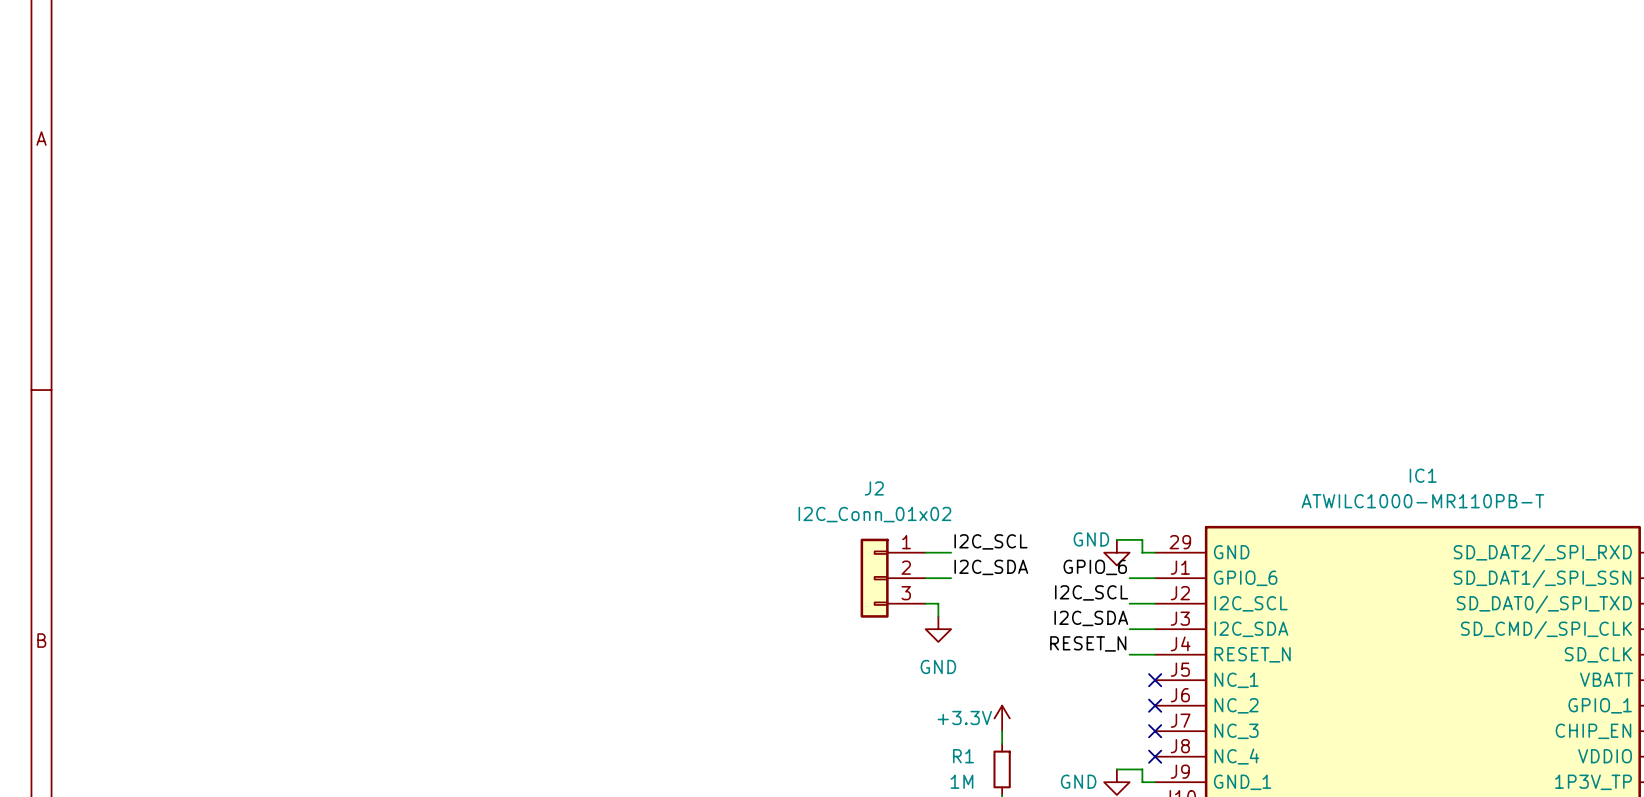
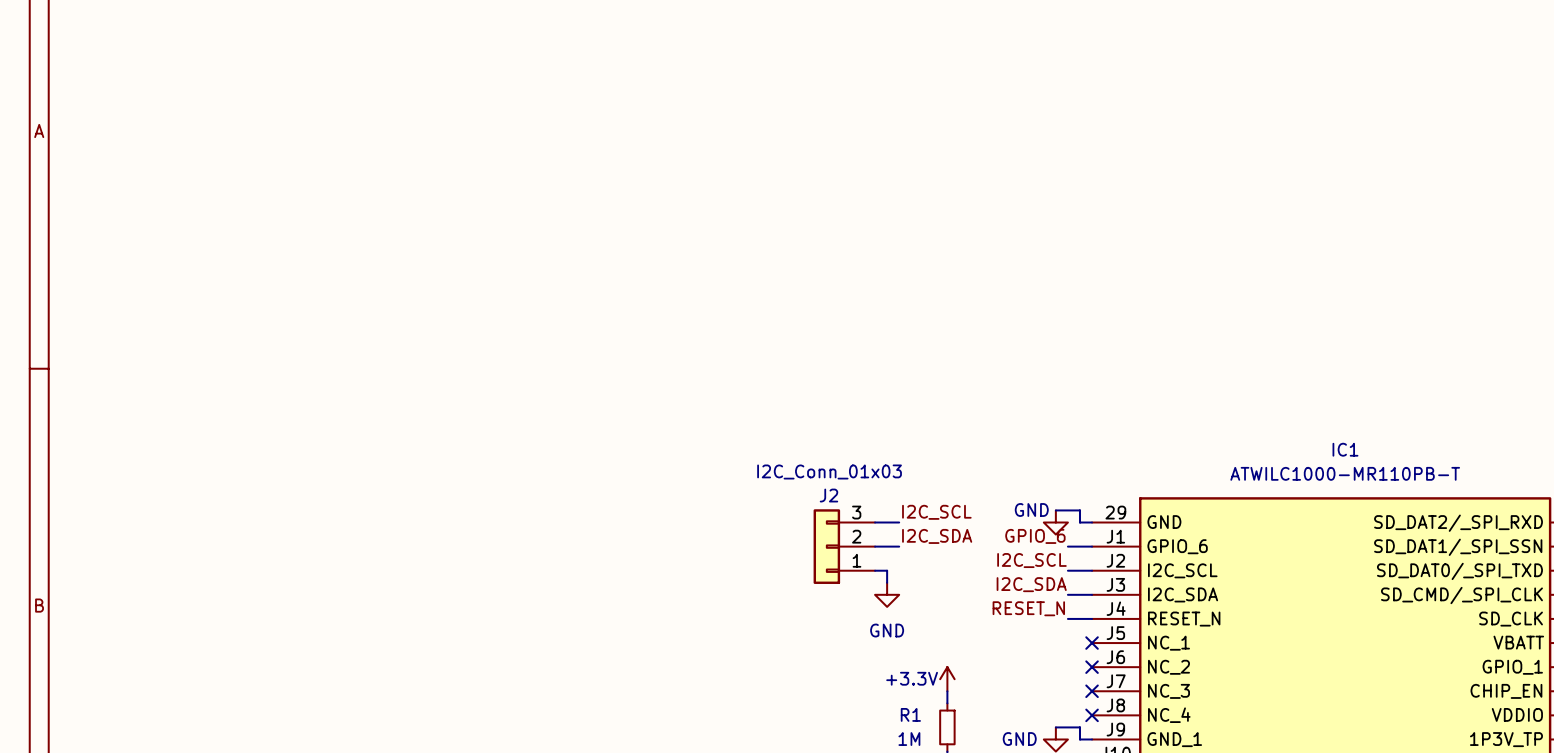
J2 name position: J2 (874, 488) -> J2 (828, 495)
J2 value: I2C_Conn_01x02 (874, 514) -> I2C_Conn_01x03 (829, 471)
J2 flip: as is (874, 578) -> up-down (826, 546)

